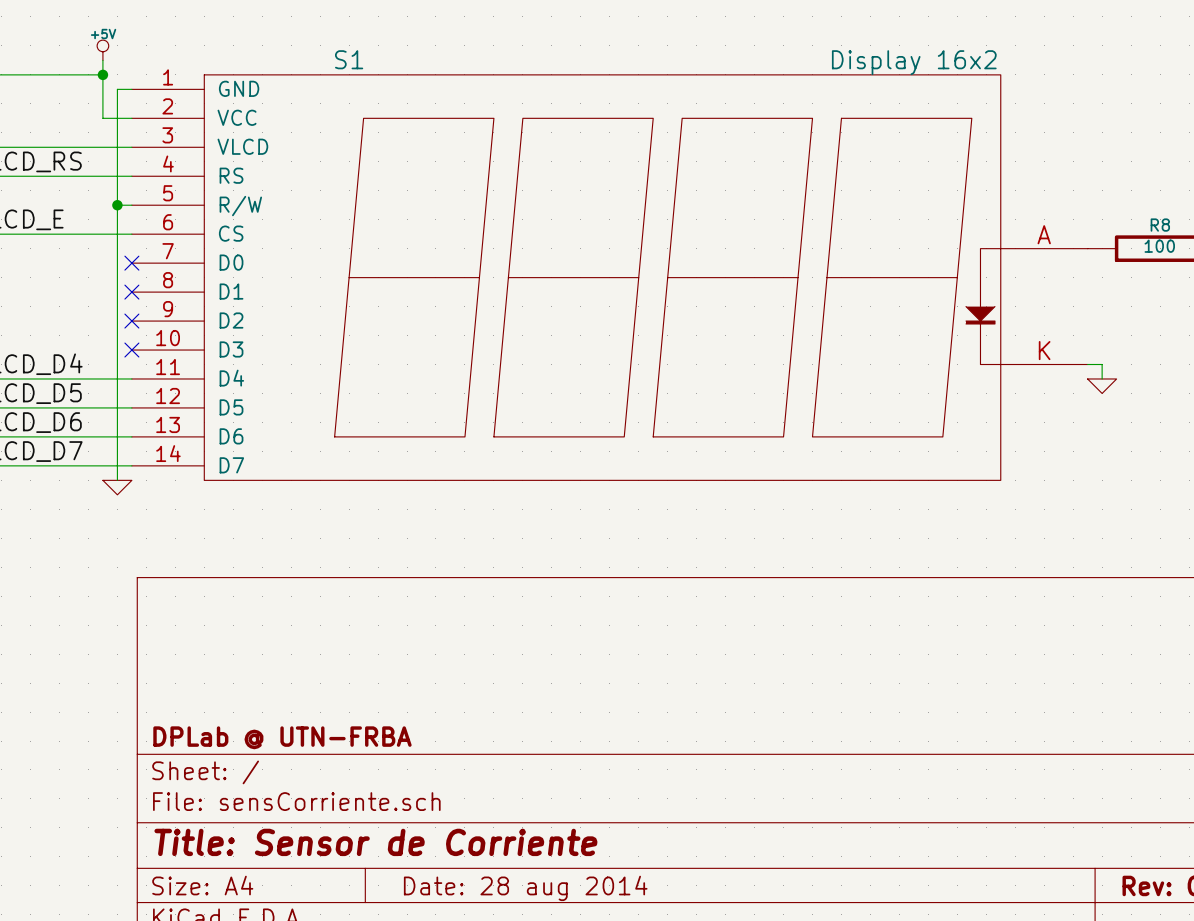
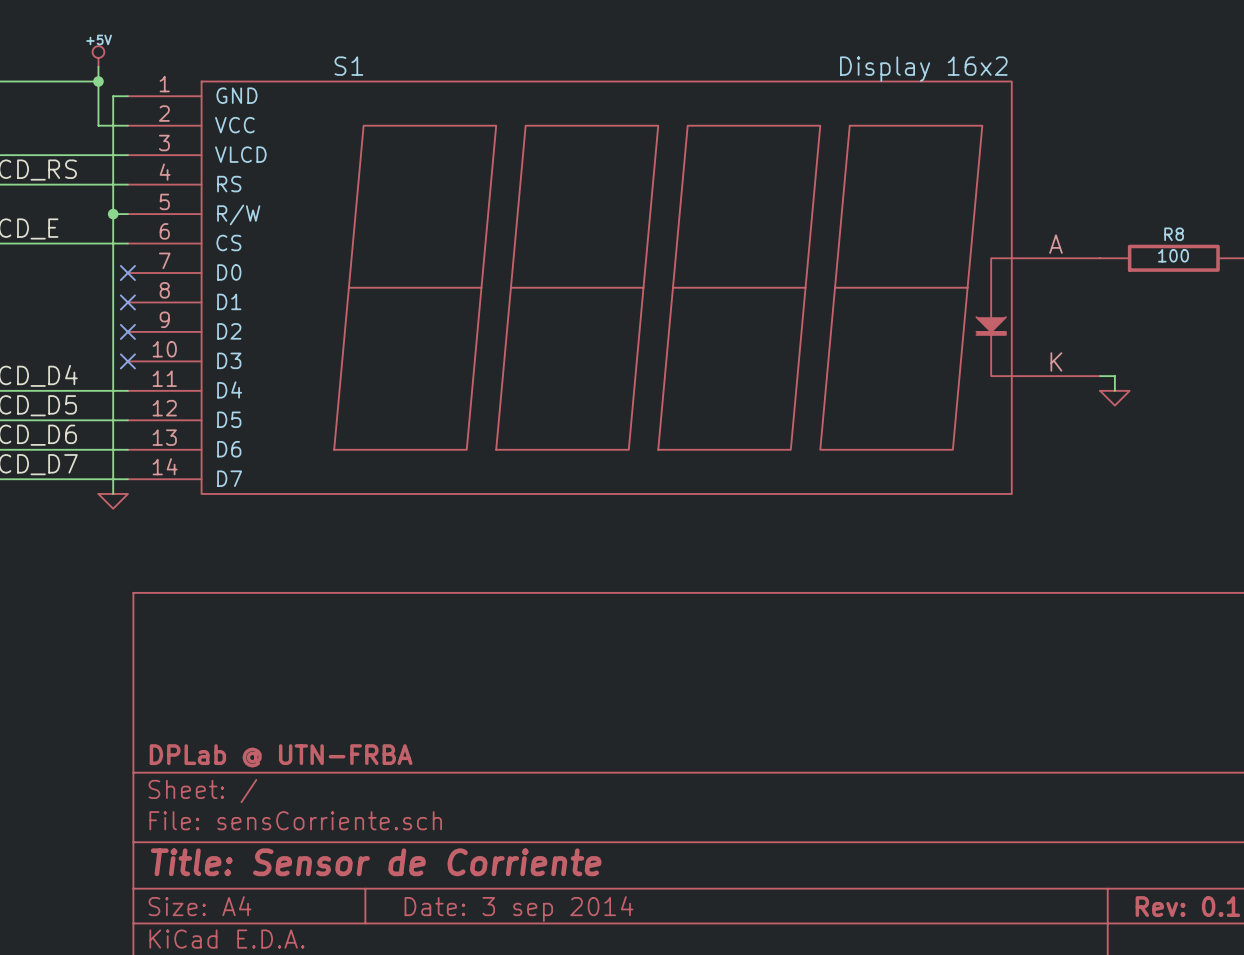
title block: Date: 28 aug 2014 (525, 888) -> Date: 3 sep 2014 (519, 909)

